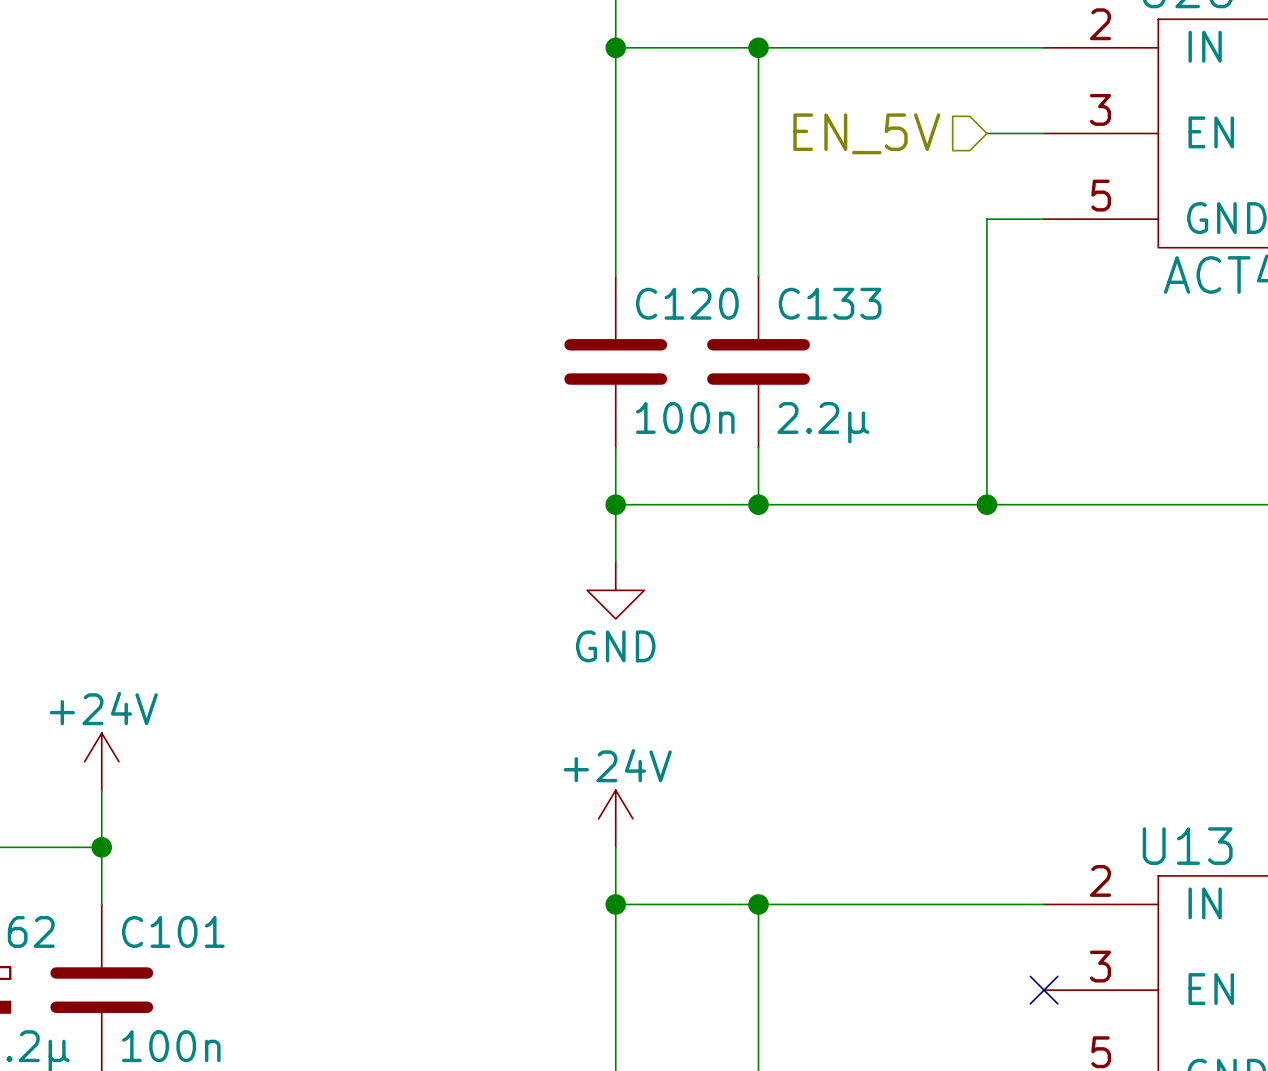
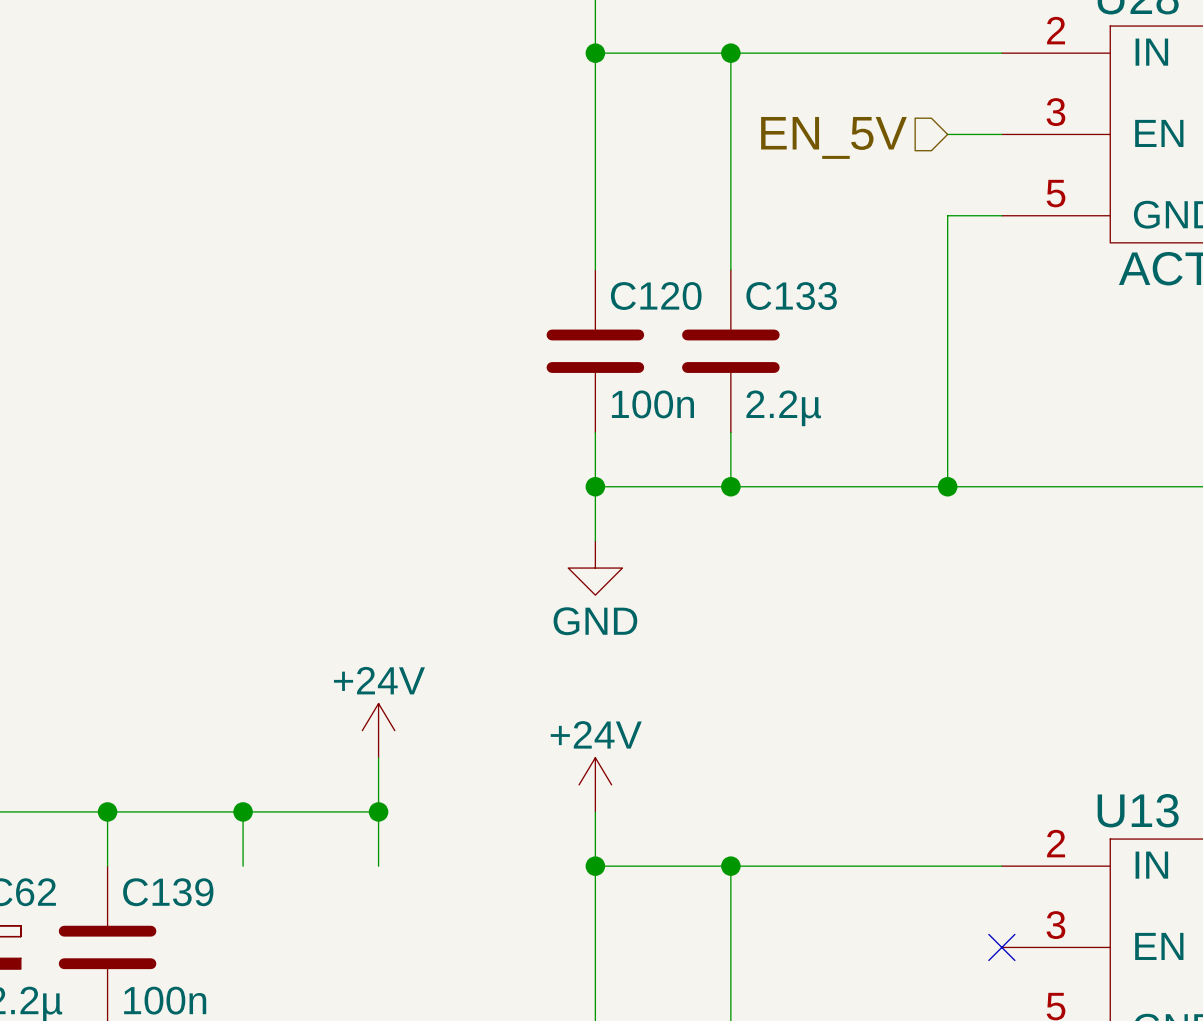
power symbol position: +24V (101, 761) -> +24V (378, 730)
wire: (101, 790) (101, 847) -> (378, 811) (107, 811)
wire: none -> (378, 757) (378, 866)
wire: none -> (243, 811) (243, 866)
junction: none -> (243, 811)
junction: none -> (378, 811)
C101 name: C101 (173, 931) -> C139 (168, 892)

